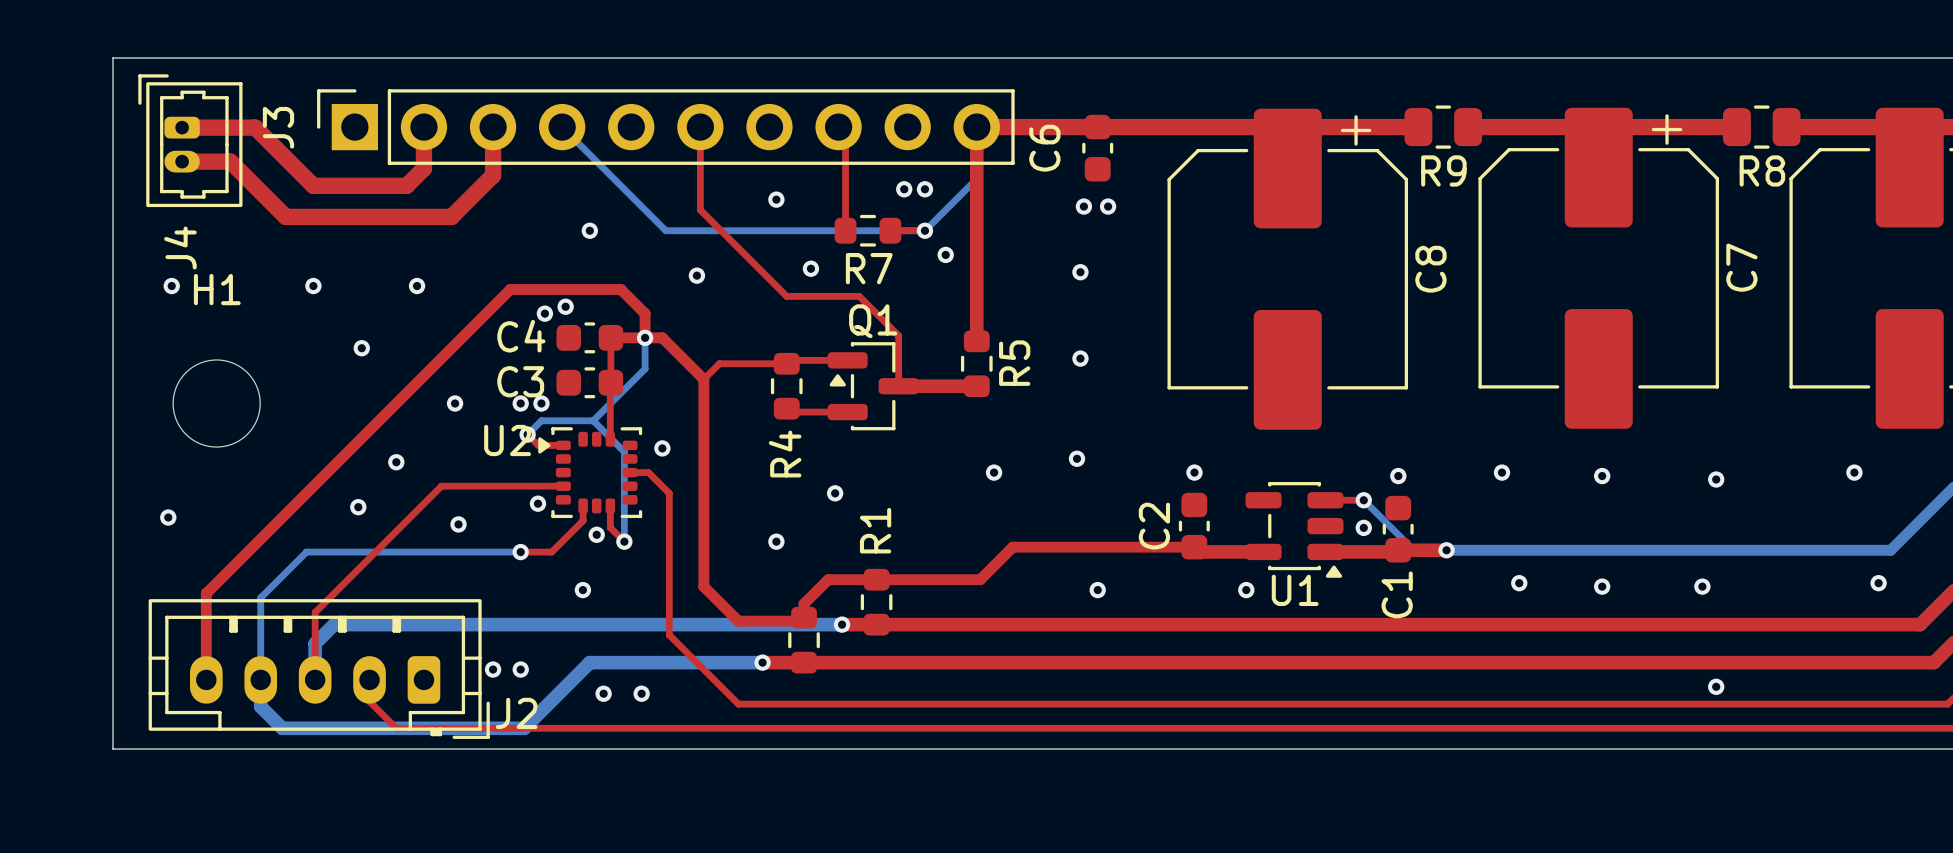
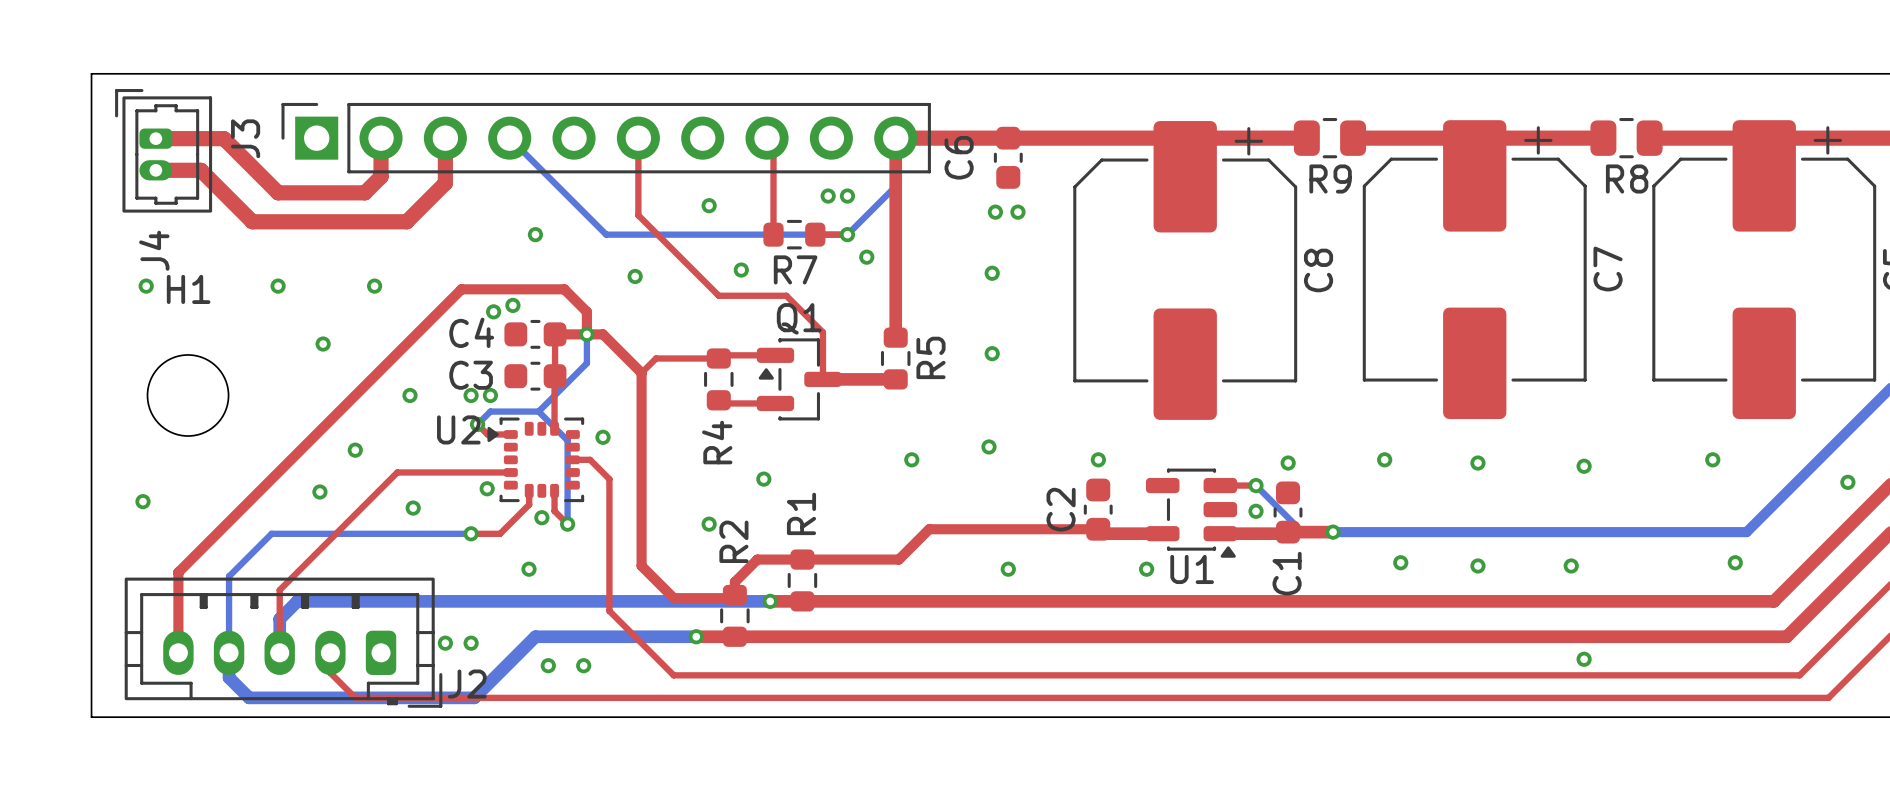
R2 name: none -> R2 (733, 541)

